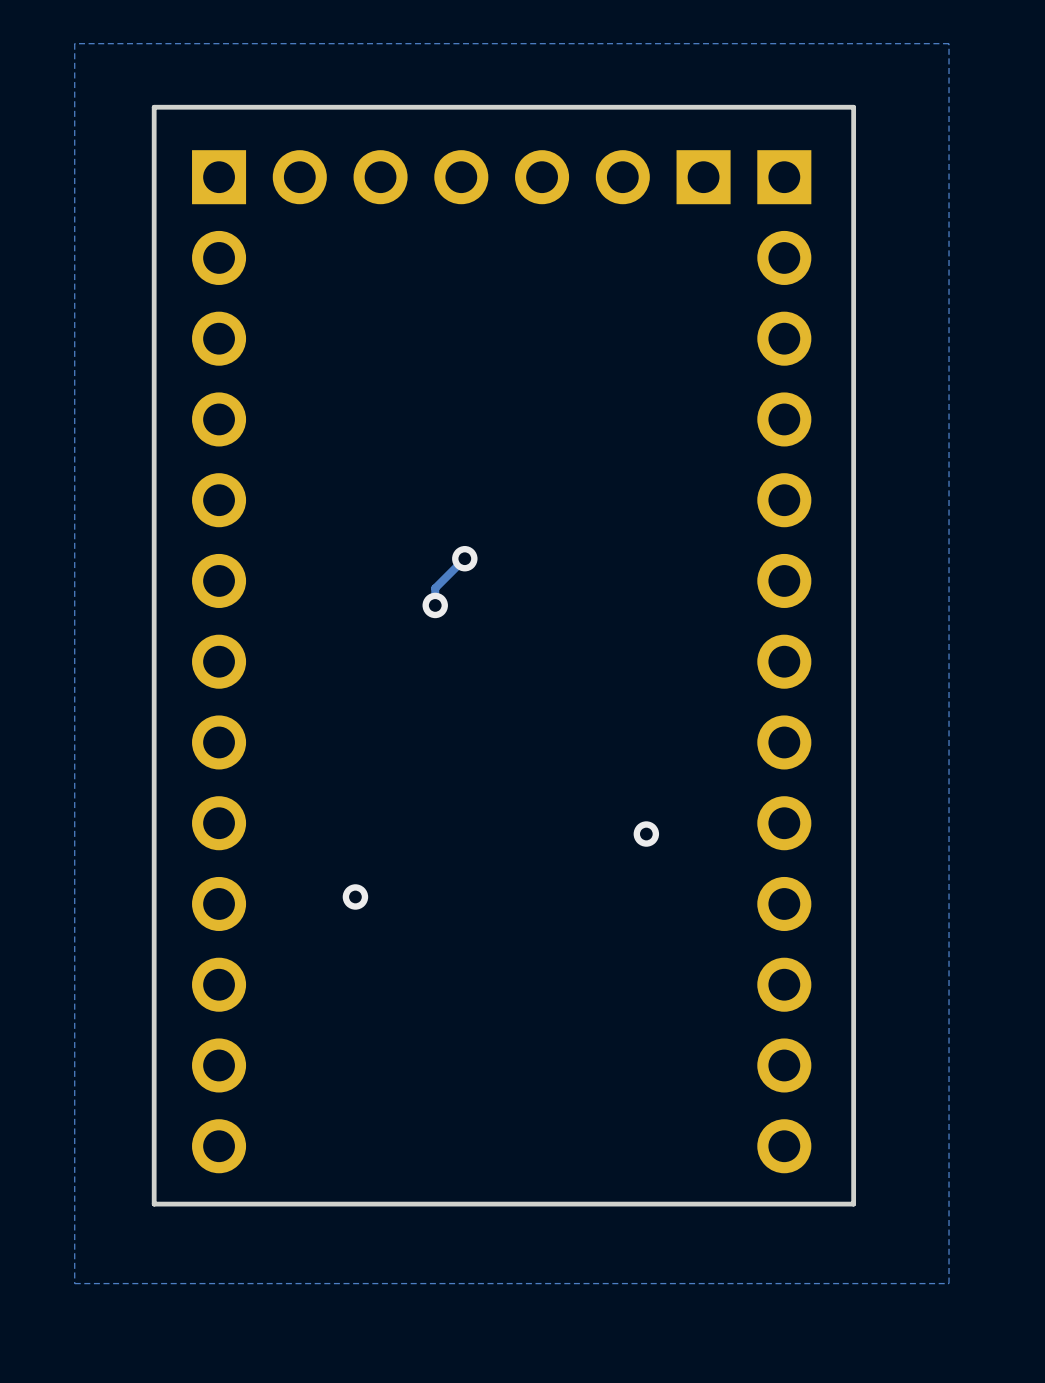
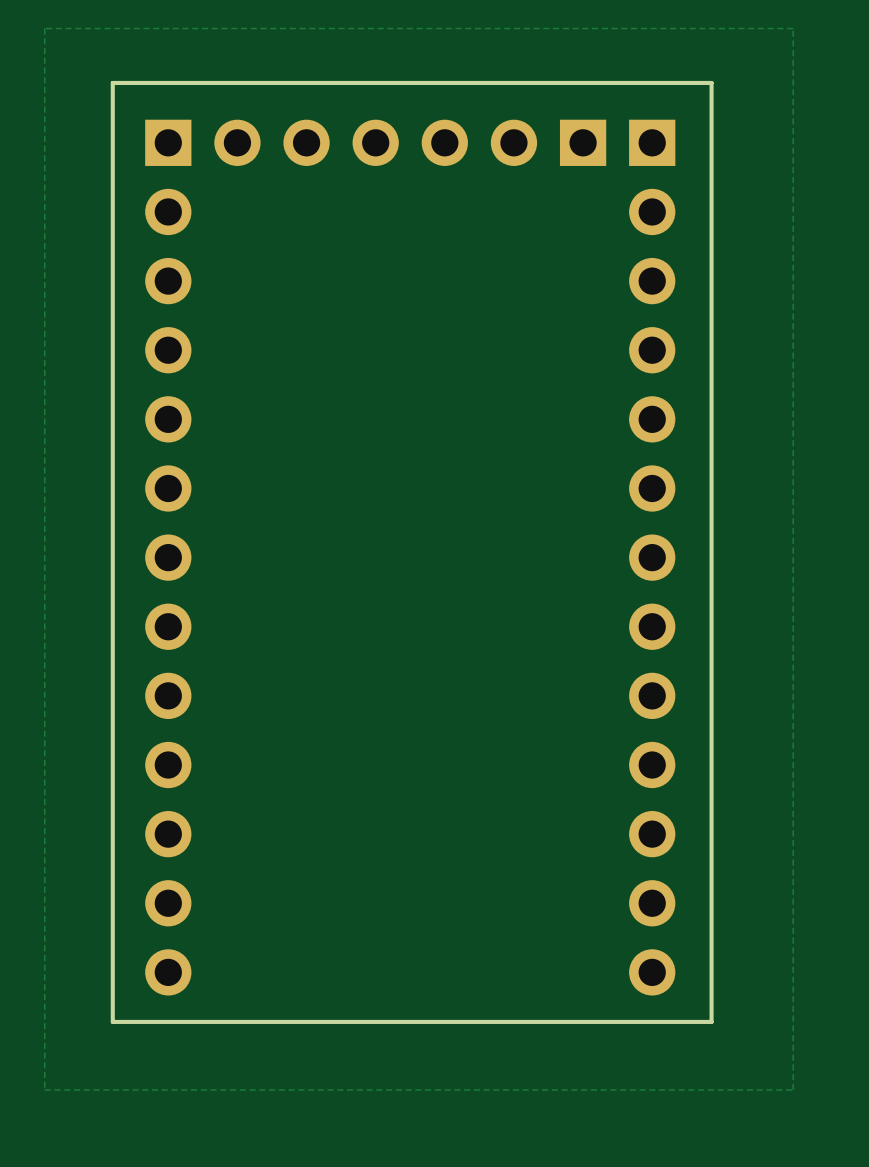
track: (464, 558) (435, 588) (435, 605) -> none
via: (464, 558) -> none
via: (435, 605) -> none
via: (646, 834) -> none
via: (355, 896) -> none

